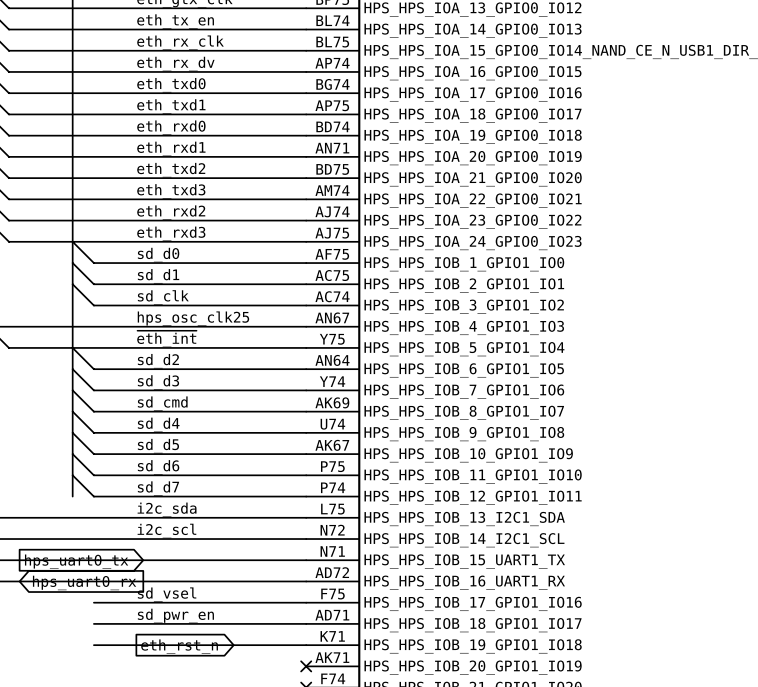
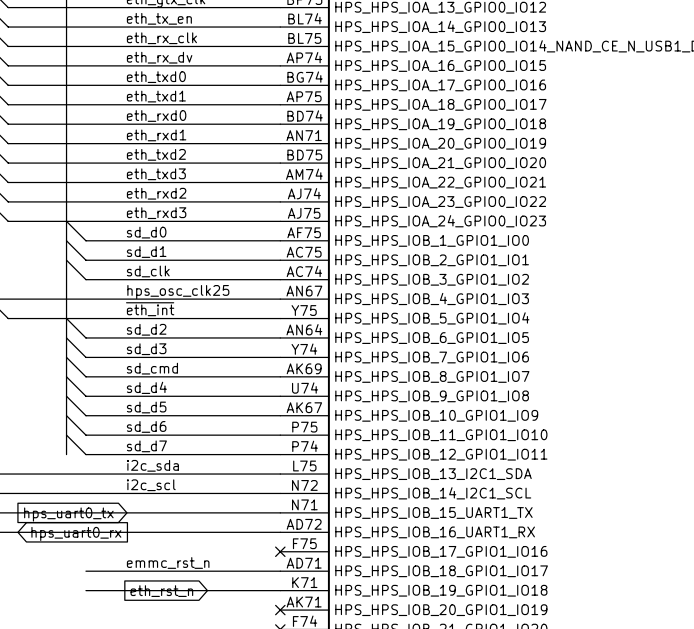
label: sd_vsel (167, 594) -> none
wire: (93, 602) (306, 602) -> none
no-connect mark: none -> (280, 551)
label: sd_pwr_en (175, 615) -> emmc_rst_n (168, 562)

